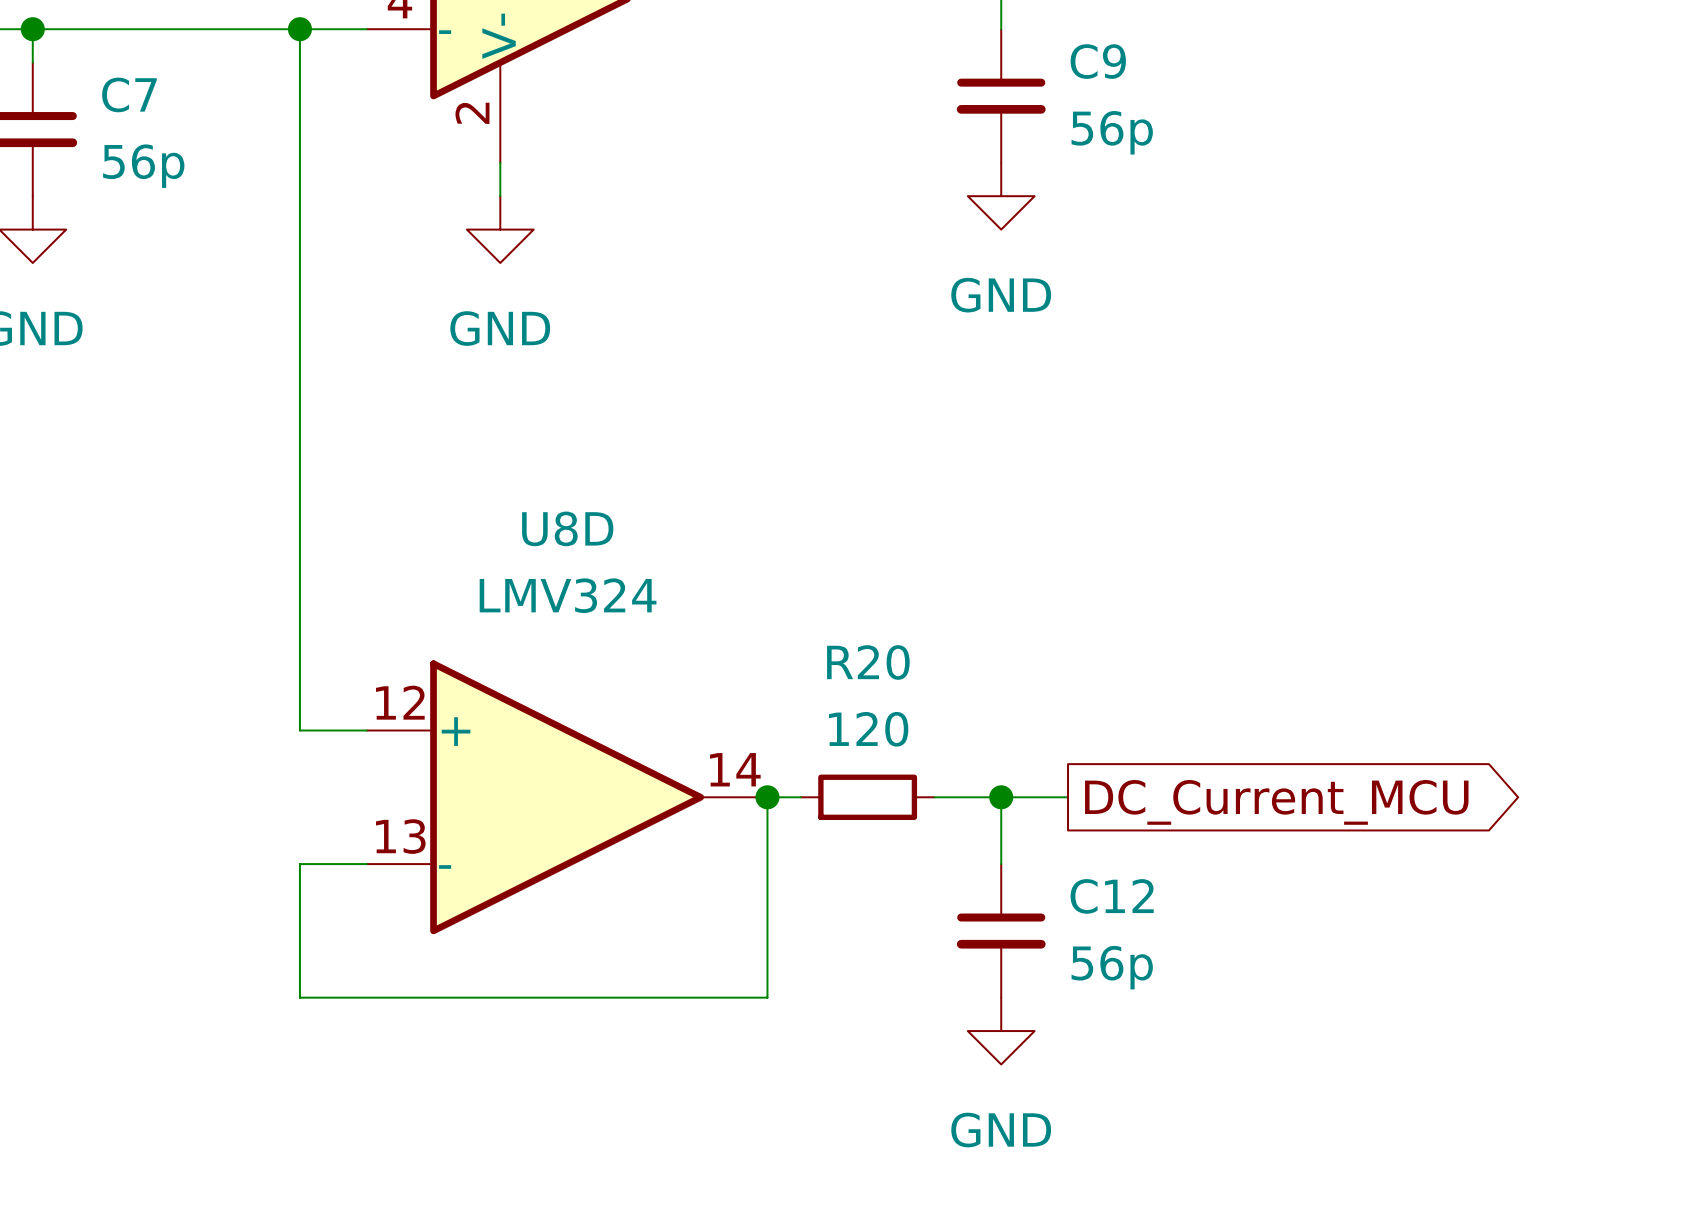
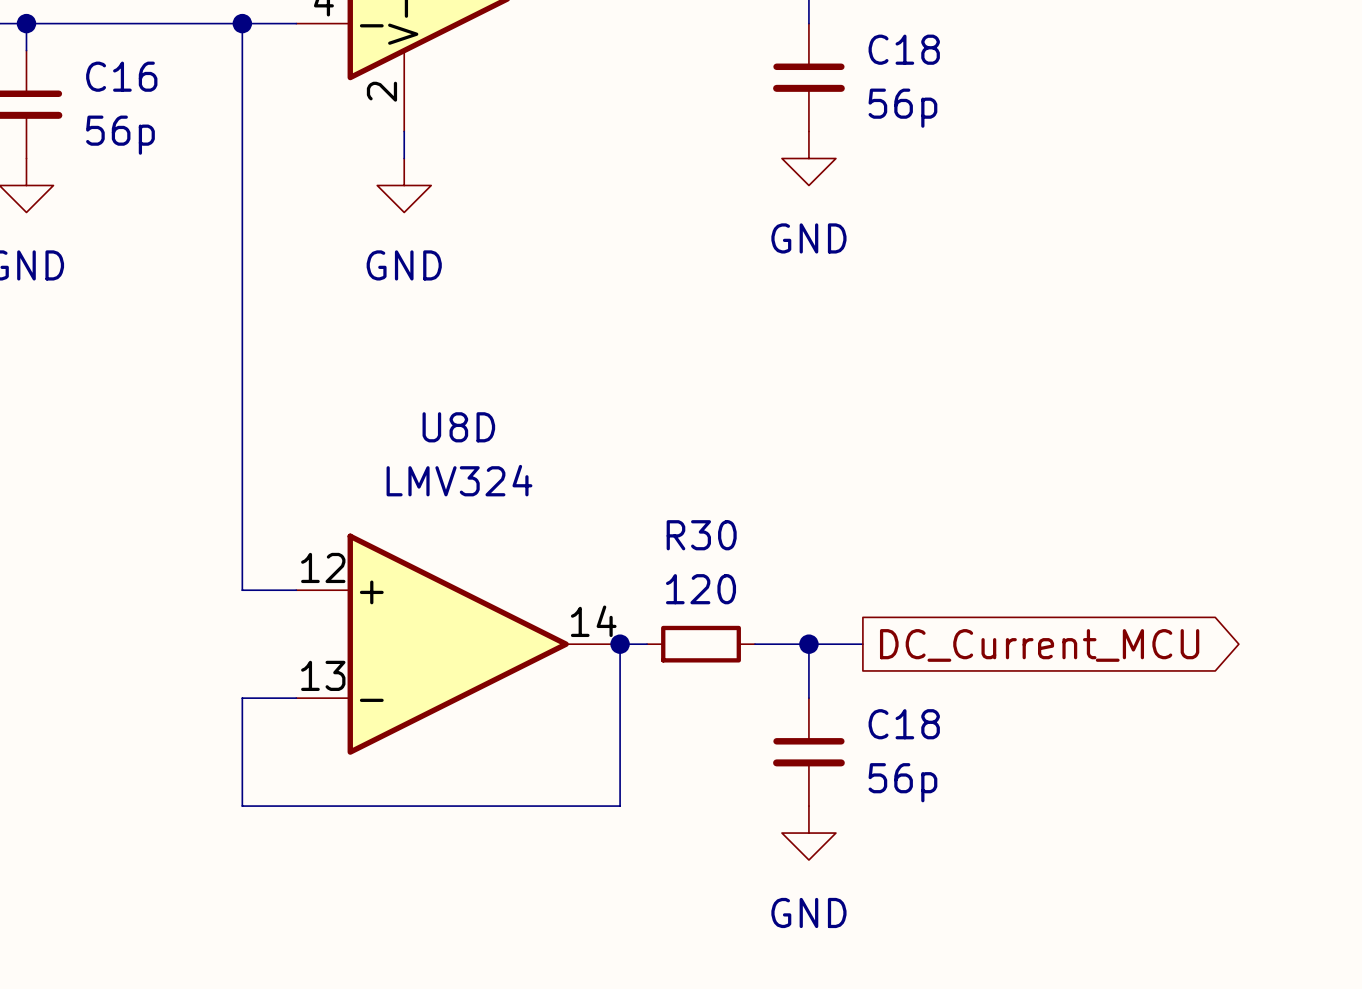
C9 name: C9 (1098, 61) -> C18 (904, 49)
C7 name: C7 (129, 94) -> C16 (121, 76)
R20 name: R20 (868, 662) -> R30 (701, 535)
C12 name: C12 (1112, 896) -> C18 (904, 724)

